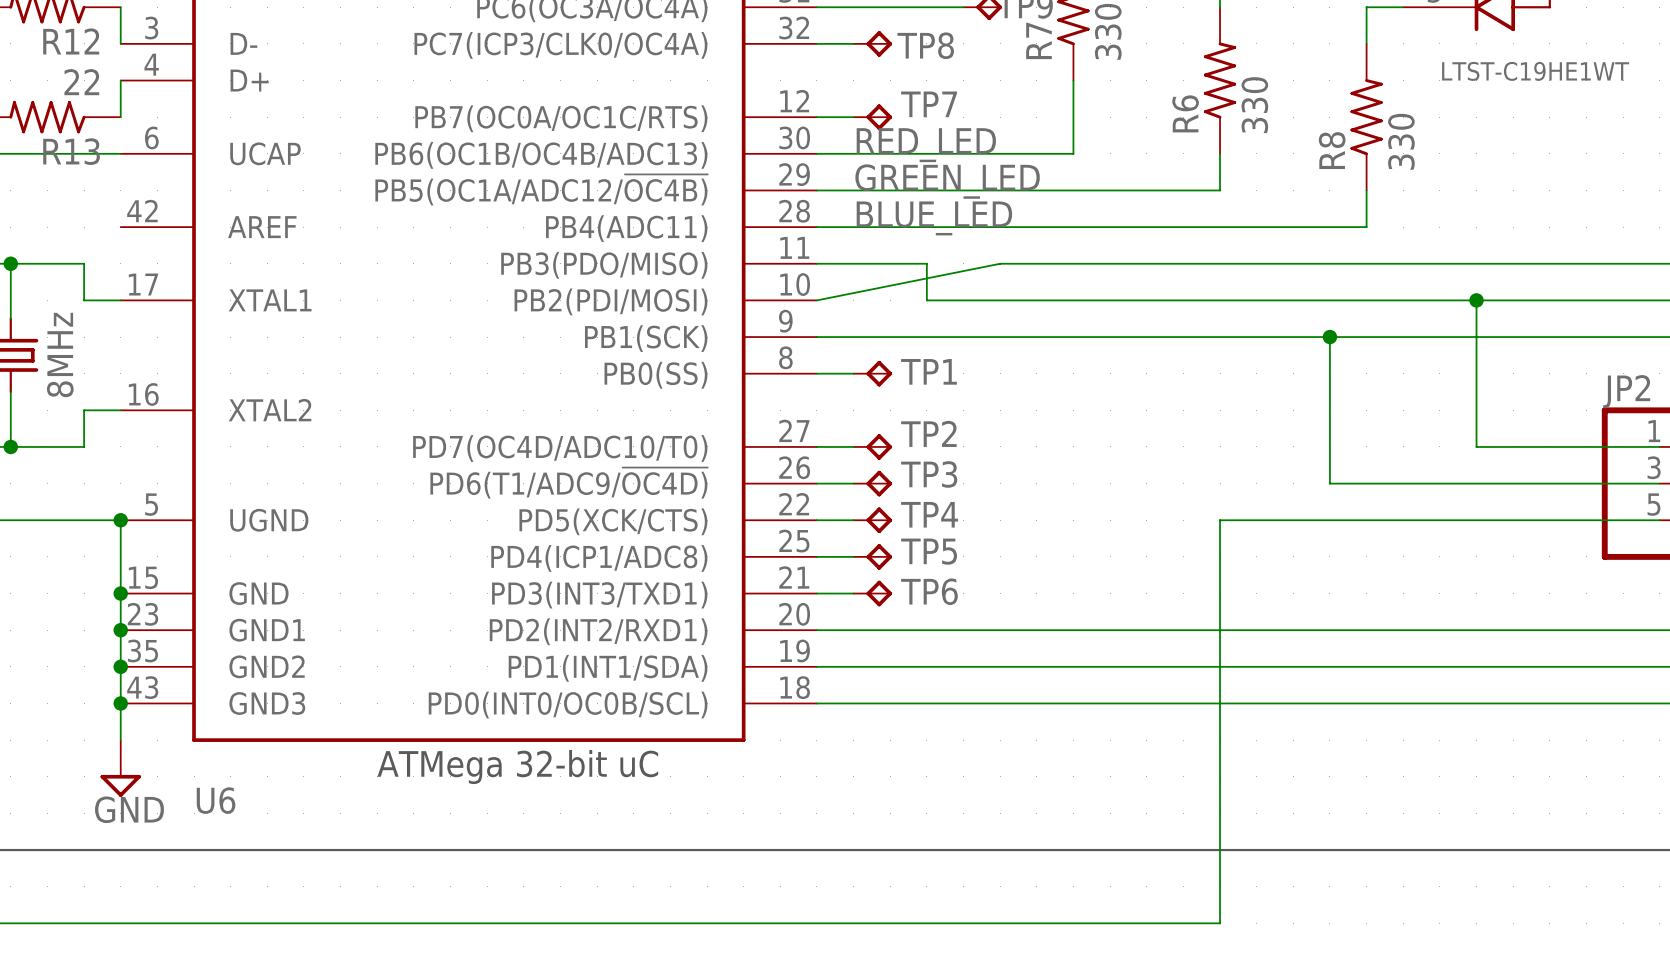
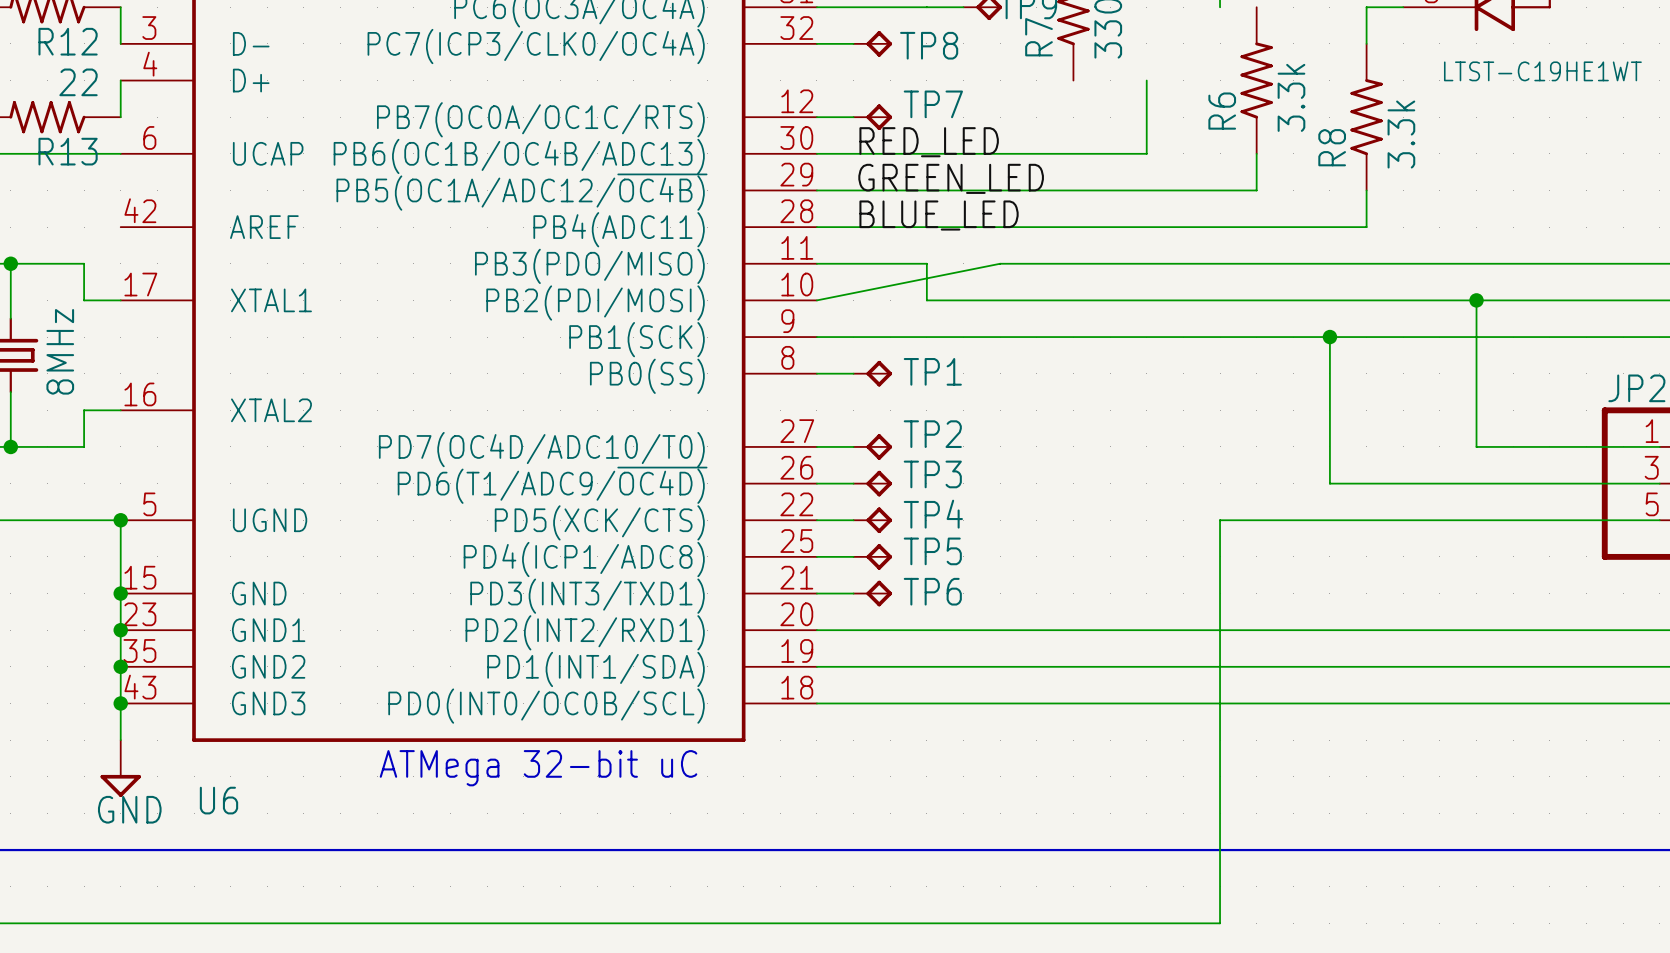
wire: (1073, 80) (1073, 153) -> (1146, 80) (1146, 153) (1073, 153)
R6 position: (1220, 80) -> (1256, 80)
R6 value: 330 (1254, 105) -> 3.3k (1291, 97)
R8 value: 330 (1401, 141) -> 3.3k (1401, 134)
wire: (1220, 153) (1220, 190) -> (1256, 153) (1256, 190) (1220, 190)

